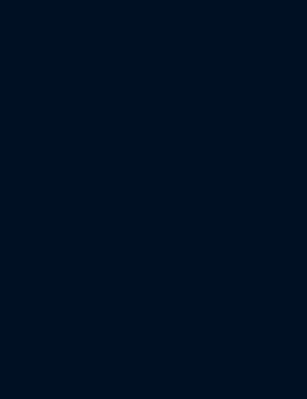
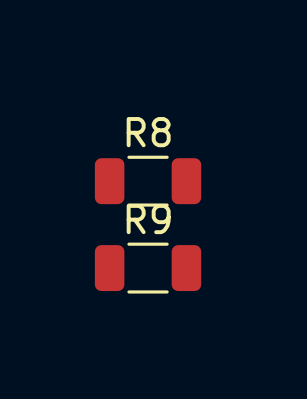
R8: none -> (148, 181)
R9: none -> (148, 268)

